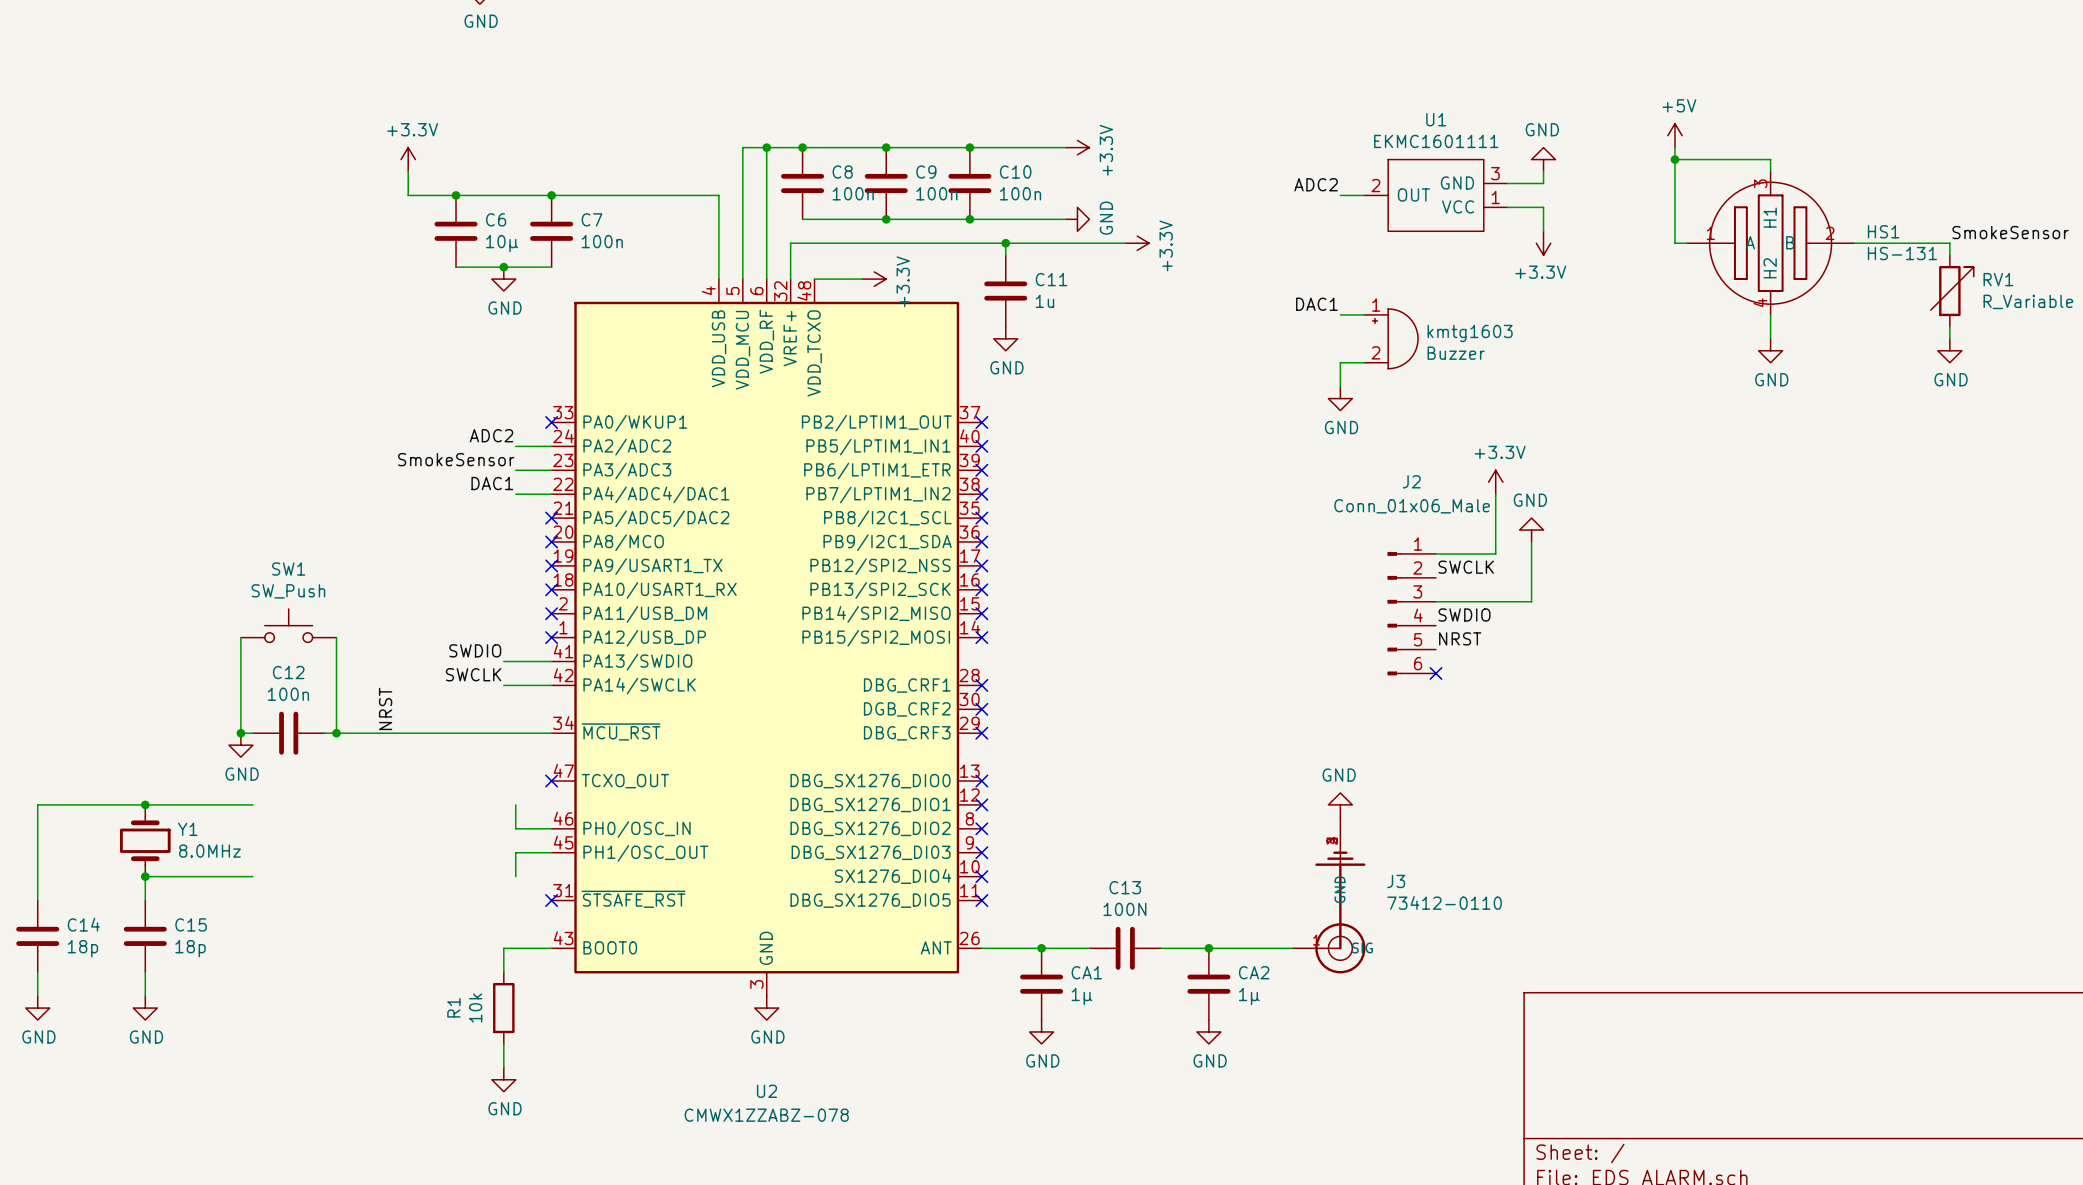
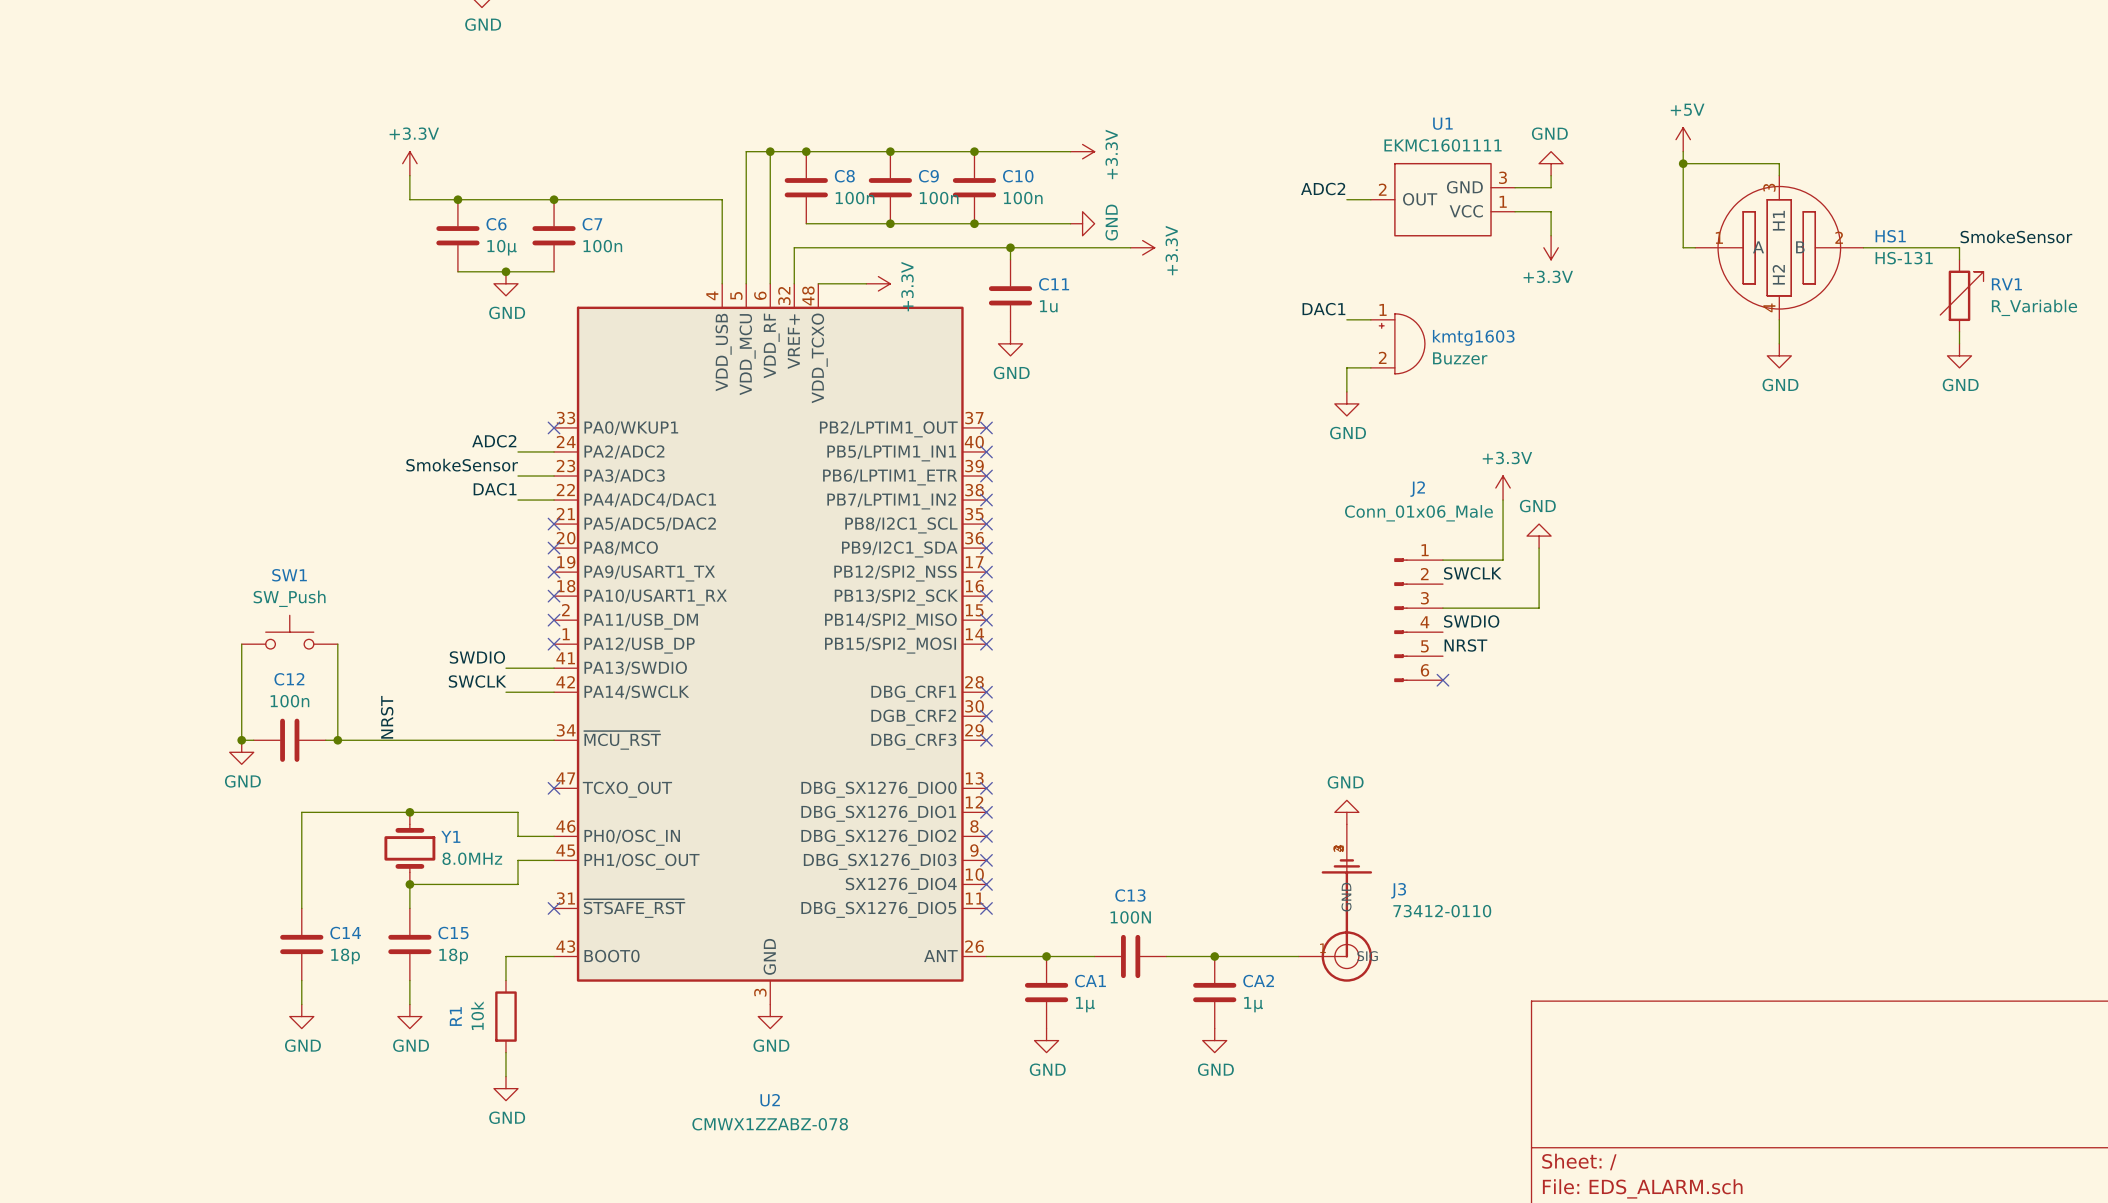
junction: (145, 804) -> none
wire: (252, 804) (37, 804) (37, 900) -> none
junction: none -> (409, 812)
wire: none -> (518, 812) (301, 812) (301, 908)
Y1 position: (145, 840) -> (409, 848)
junction: (145, 876) -> none
wire: (252, 876) (145, 876) (145, 900) -> none
junction: none -> (409, 884)
wire: none -> (518, 884) (409, 884) (409, 908)
C14 position: (37, 936) -> (301, 944)
C15 position: (145, 936) -> (409, 944)
wire: (37, 972) (37, 996) -> none
wire: (145, 972) (145, 996) -> (301, 980) (301, 1004)
wire: none -> (409, 980) (409, 1004)
power symbol: GND (37, 1008) -> none
power symbol: GND (145, 1008) -> none
power symbol: none -> GND (301, 1016)
power symbol: none -> GND (409, 1016)

